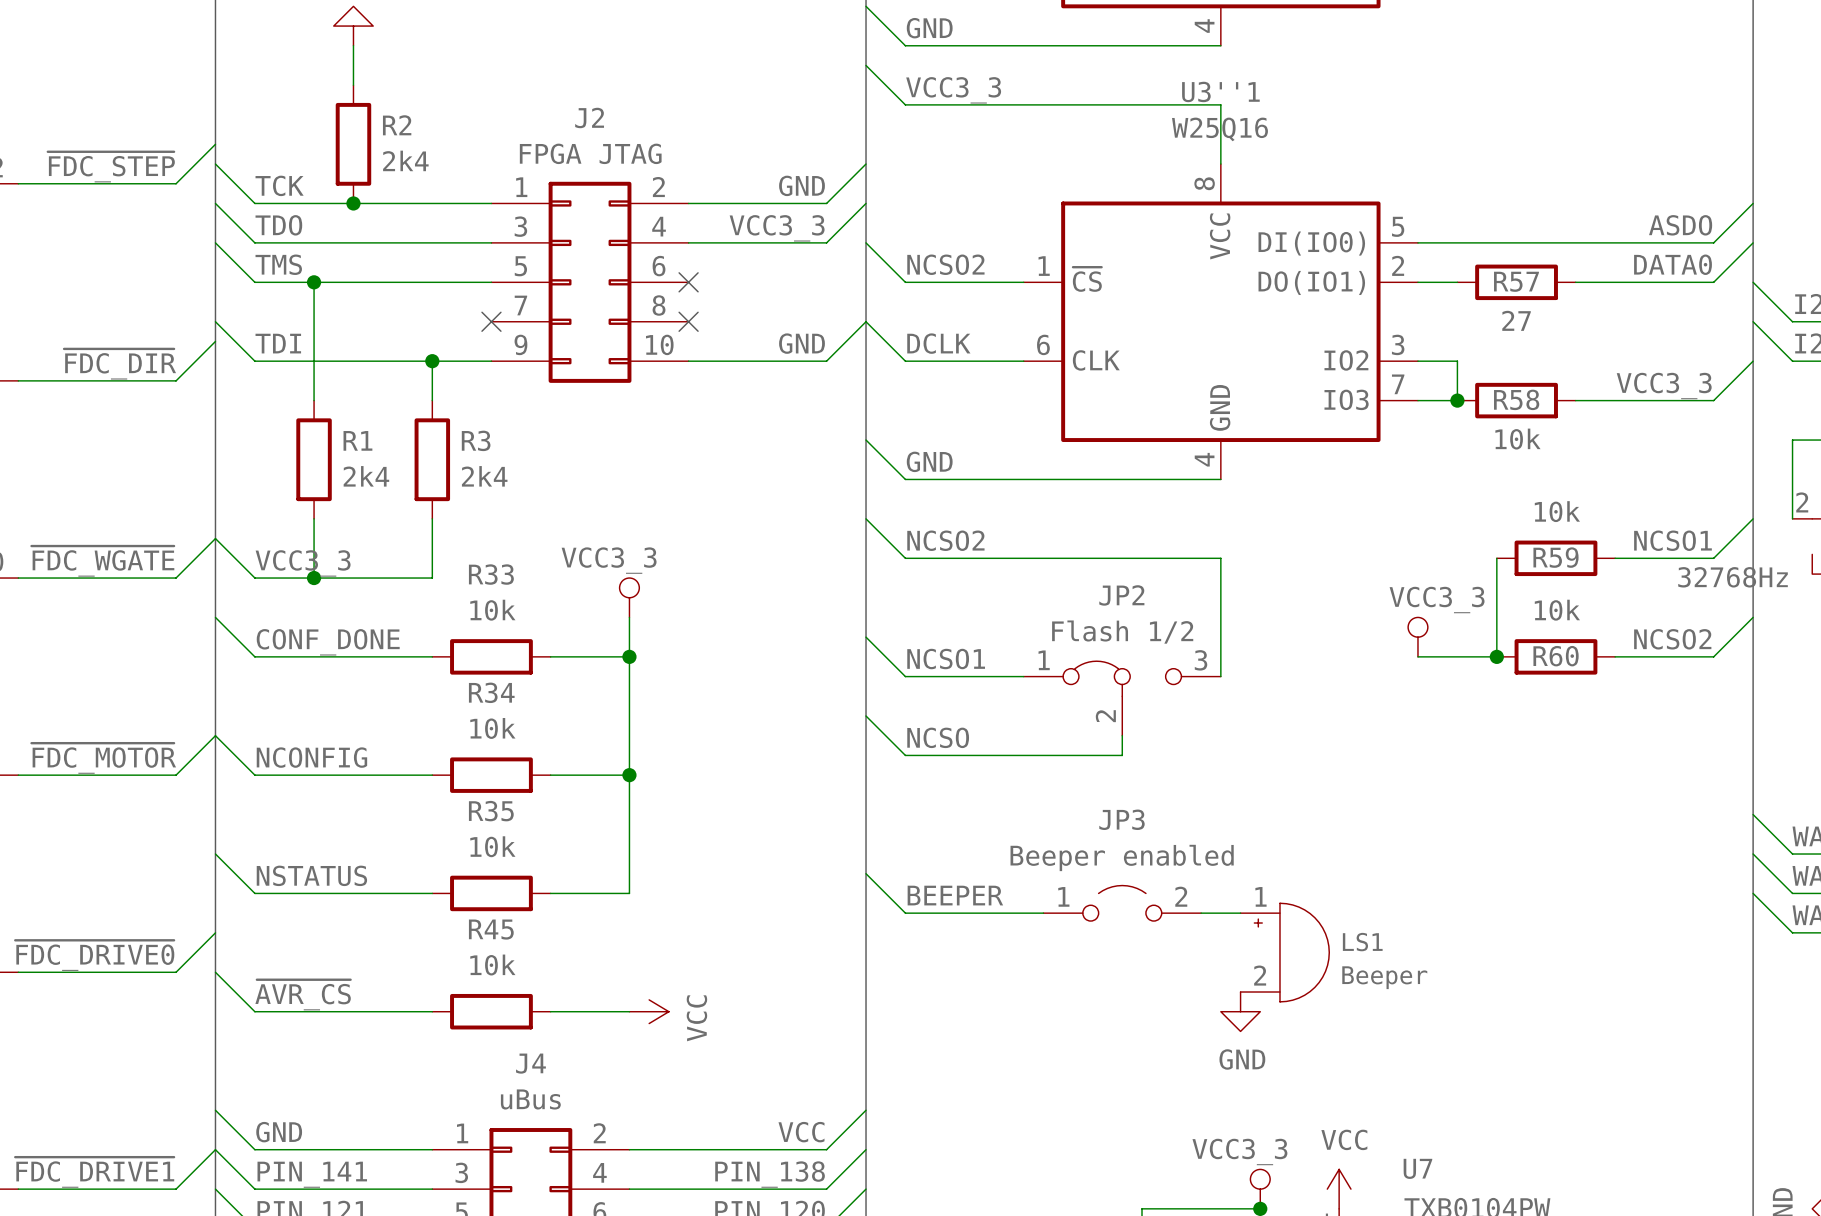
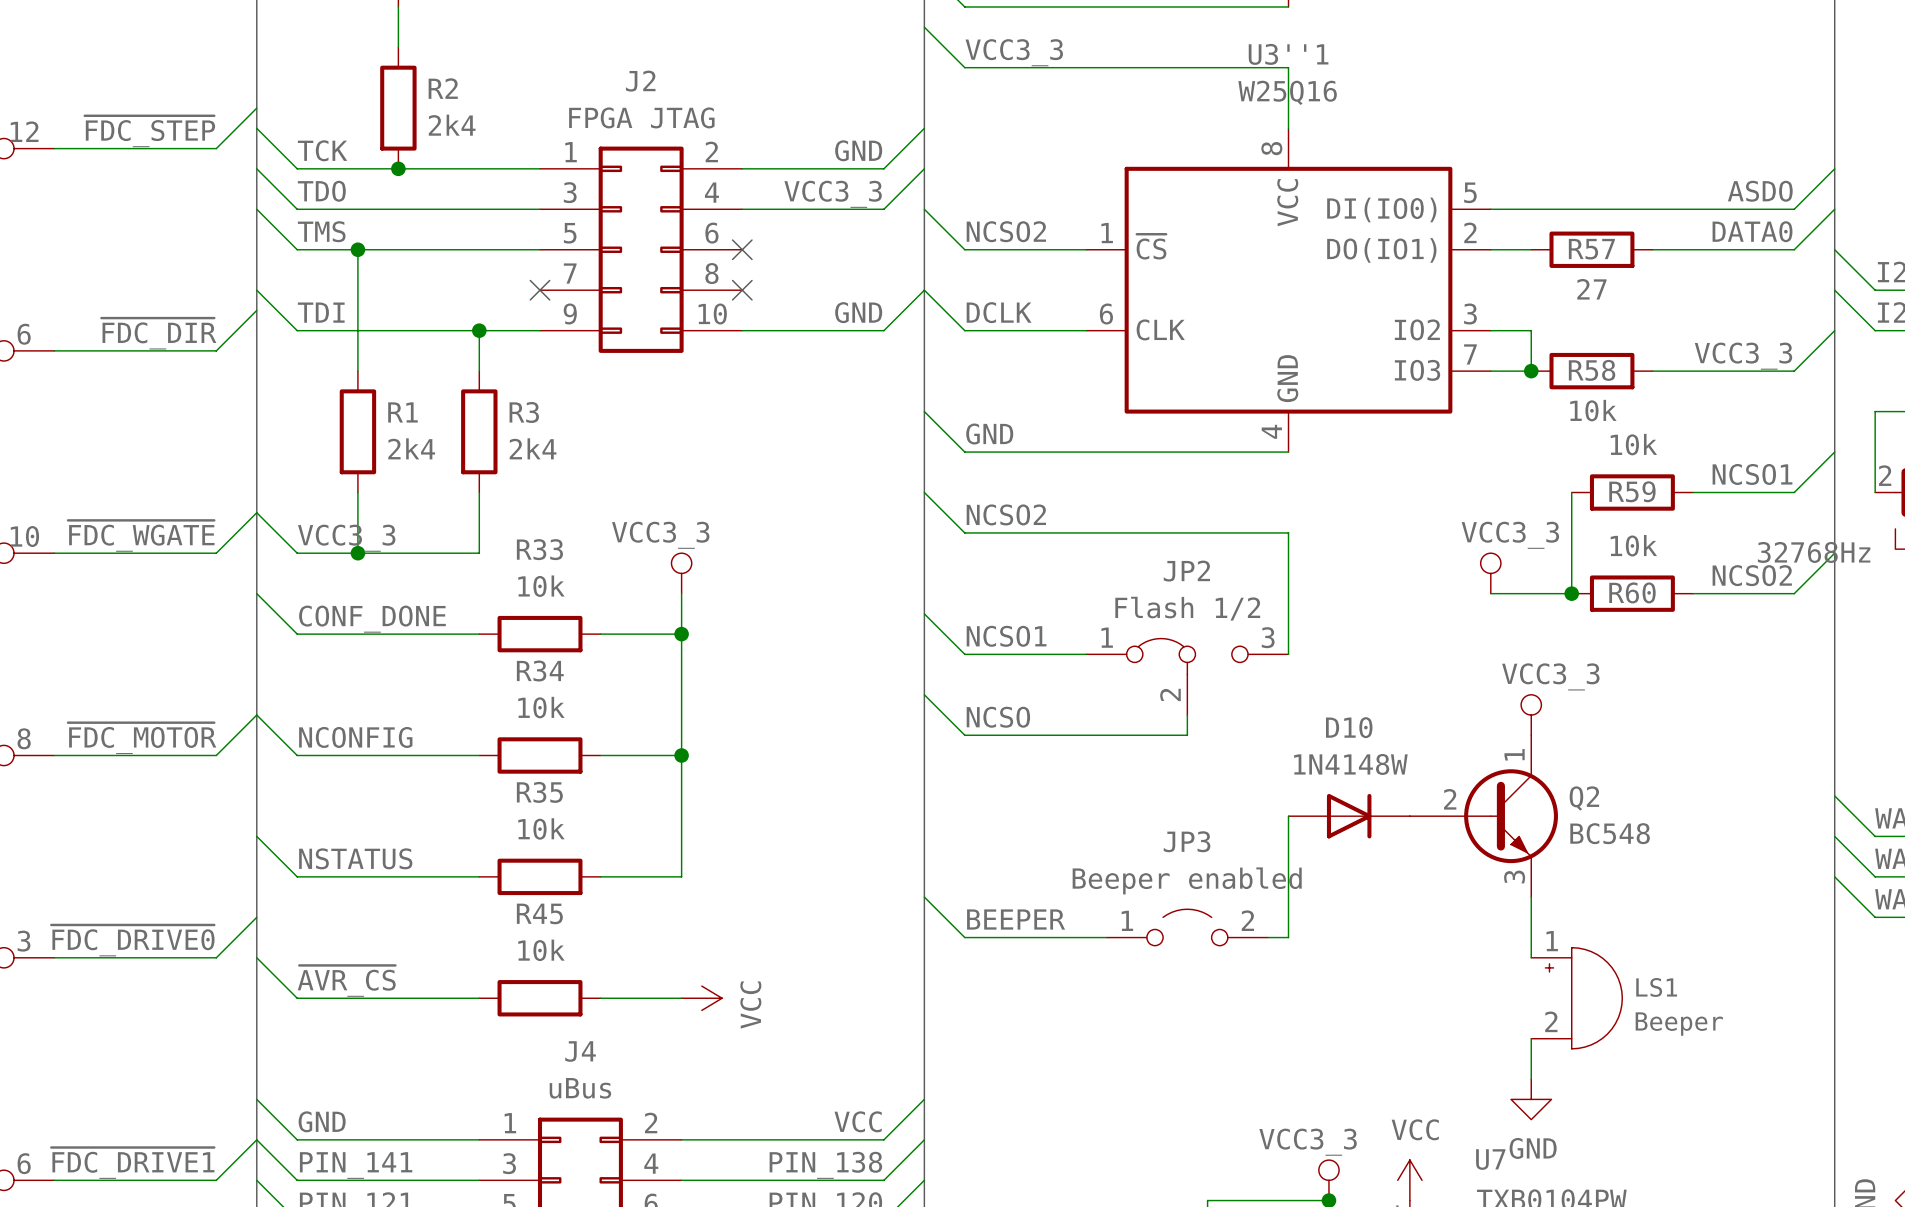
wire: none -> (1571, 492) (1571, 532)
wire: (1753, 518) (1713, 558) (1615, 558) -> (1834, 452) (1794, 492) (1693, 492)
label position: NCSO1 (1672, 540) -> NCSO1 (1752, 474)
R59 position: (1555, 558) -> (1632, 492)
wire: (1496, 617) (1496, 656) (1417, 656) -> (1571, 593) (1490, 593)
wire: (1753, 617) (1713, 656) (1615, 656) -> (1834, 553) (1794, 593) (1693, 593)
power symbol position: VCC3_3 (1417, 637) -> VCC3_3 (1490, 573)
label position: NCSO2 (1672, 639) -> NCSO2 (1752, 575)
junction position: (1496, 656) -> (1571, 593)
R60 position: (1555, 656) -> (1632, 593)
power symbol: none -> VCC3_3 (1531, 715)
wire: none -> (1288, 816) (1288, 937) (1268, 937)
D10: none -> 1N4148W (1349, 816)
Q2: none -> BC548 (1483, 816)
wire: (866, 873) (905, 913) (1043, 913) -> (924, 897) (964, 937) (1106, 937)
label position: BEEPER (955, 895) -> BEEPER (1016, 919)
JP3 position: (1122, 903) -> (1187, 927)
wire: (1201, 913) (1240, 913) -> none
wire: none -> (1531, 897) (1531, 957)
LS1 position: (1284, 952) -> (1576, 998)
power symbol position: GND (1240, 1011) -> GND (1531, 1099)
wire: none -> (1531, 1038) (1531, 1079)

